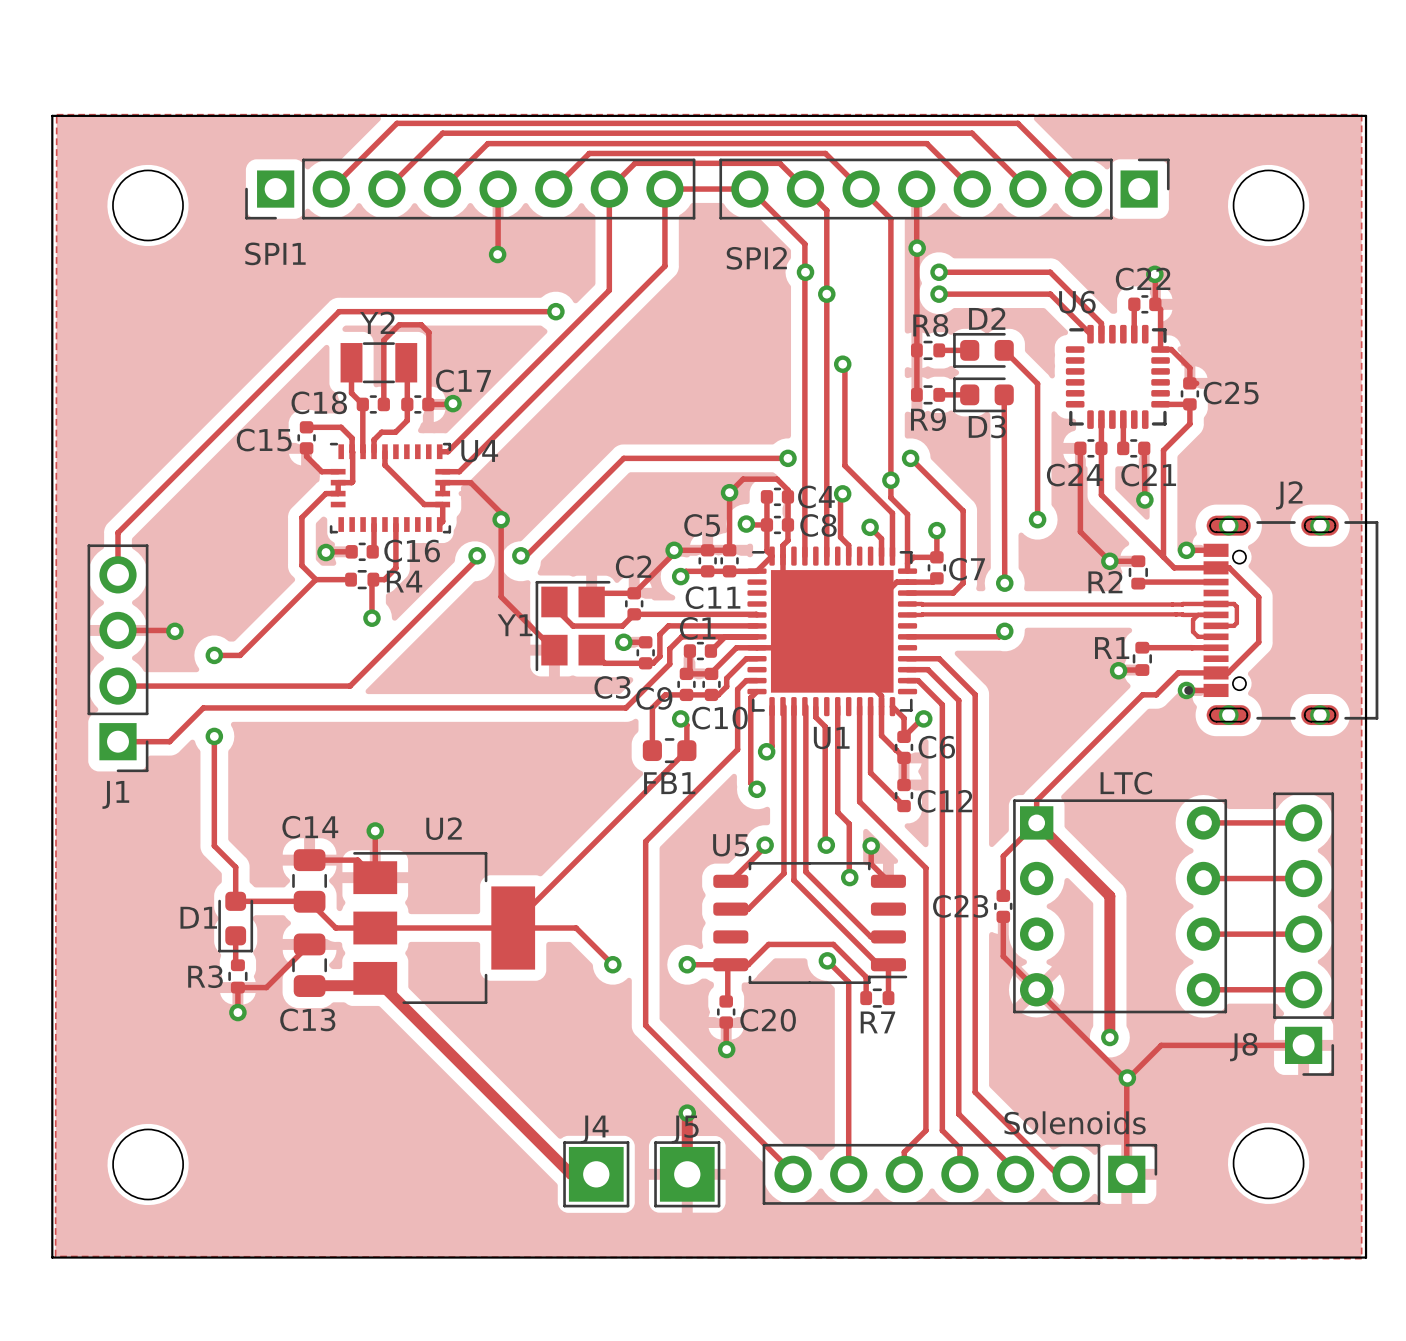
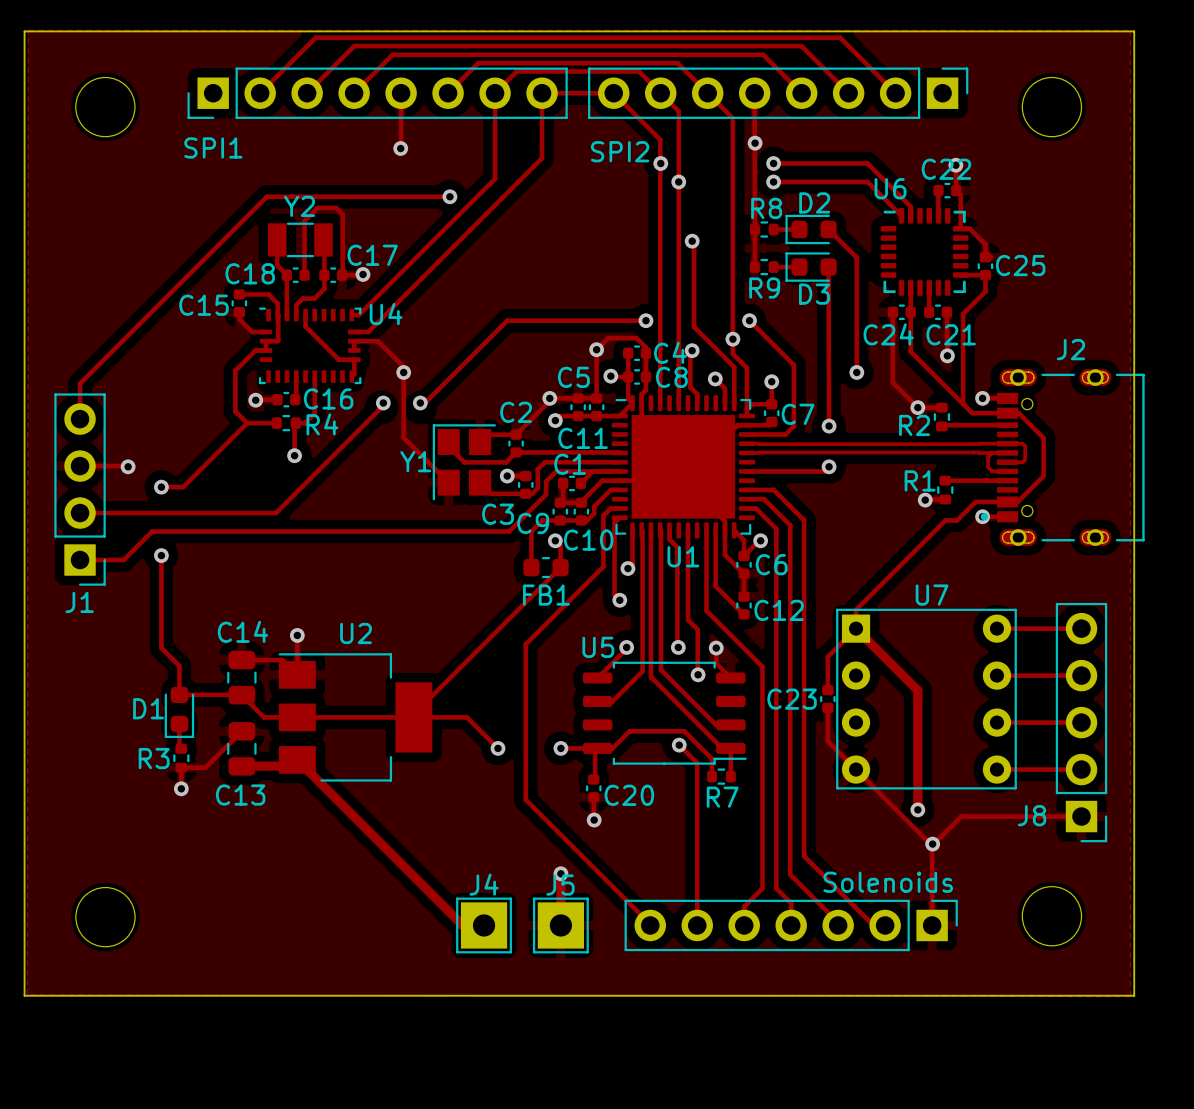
LTC name: LTC (1126, 783) -> U7 (932, 595)

